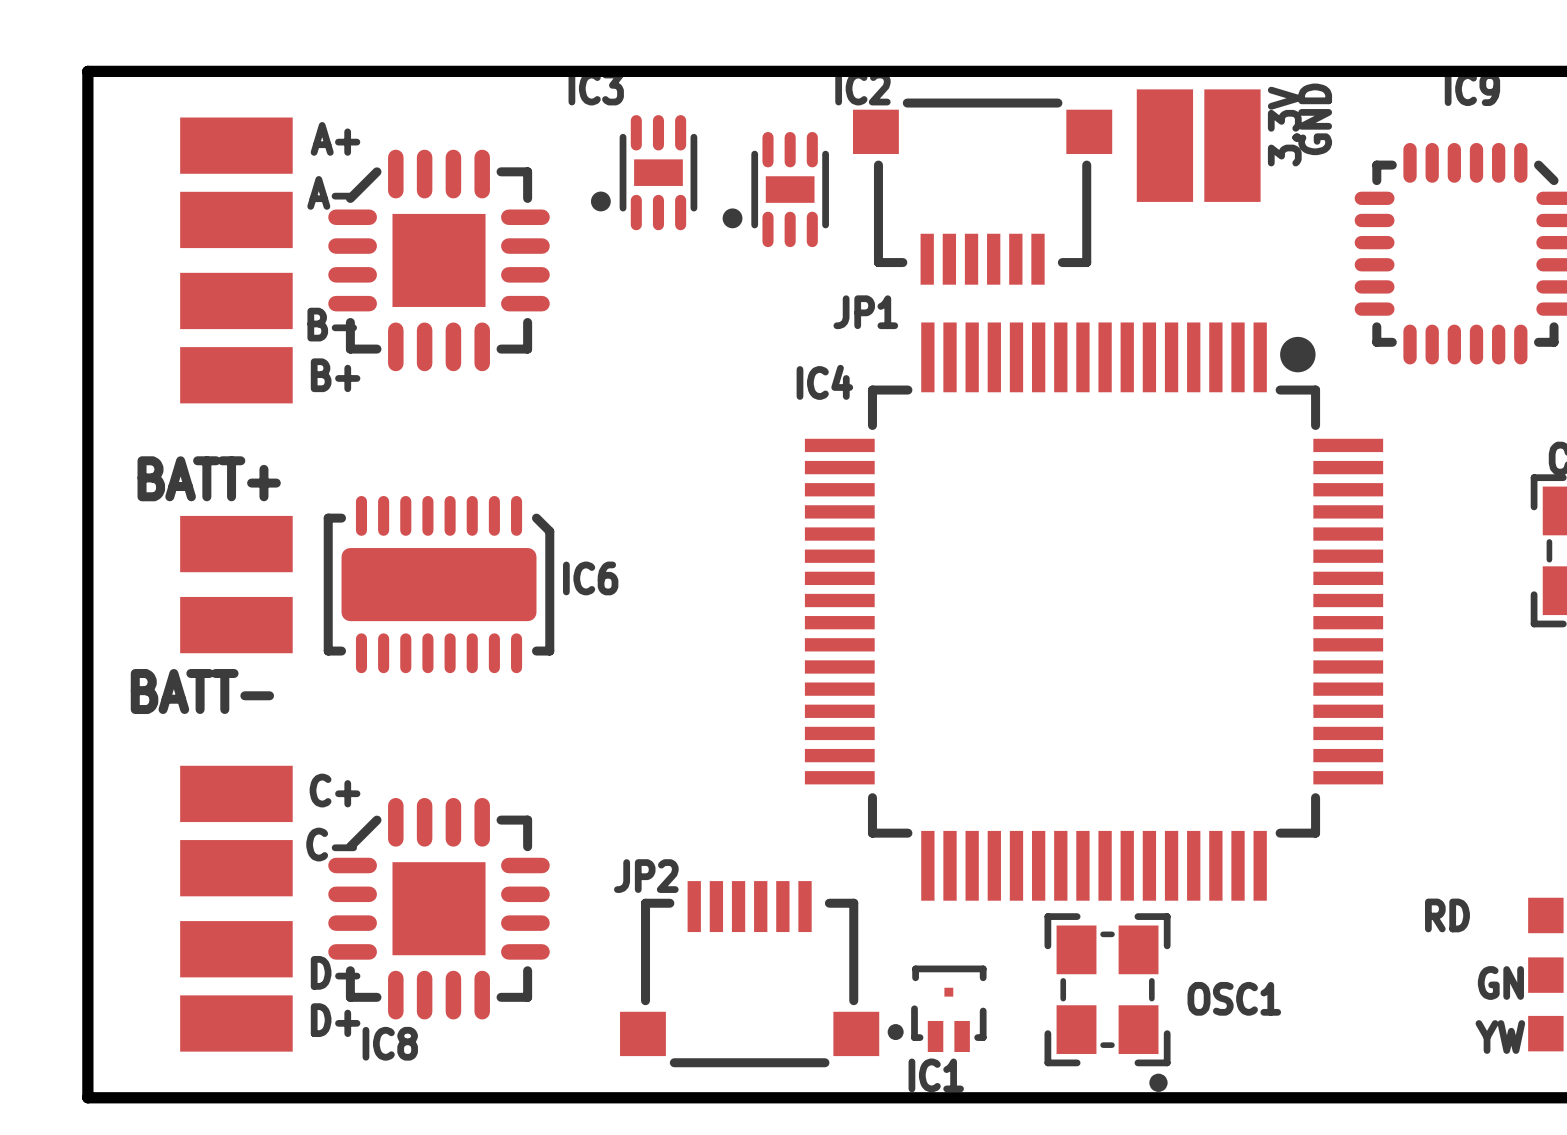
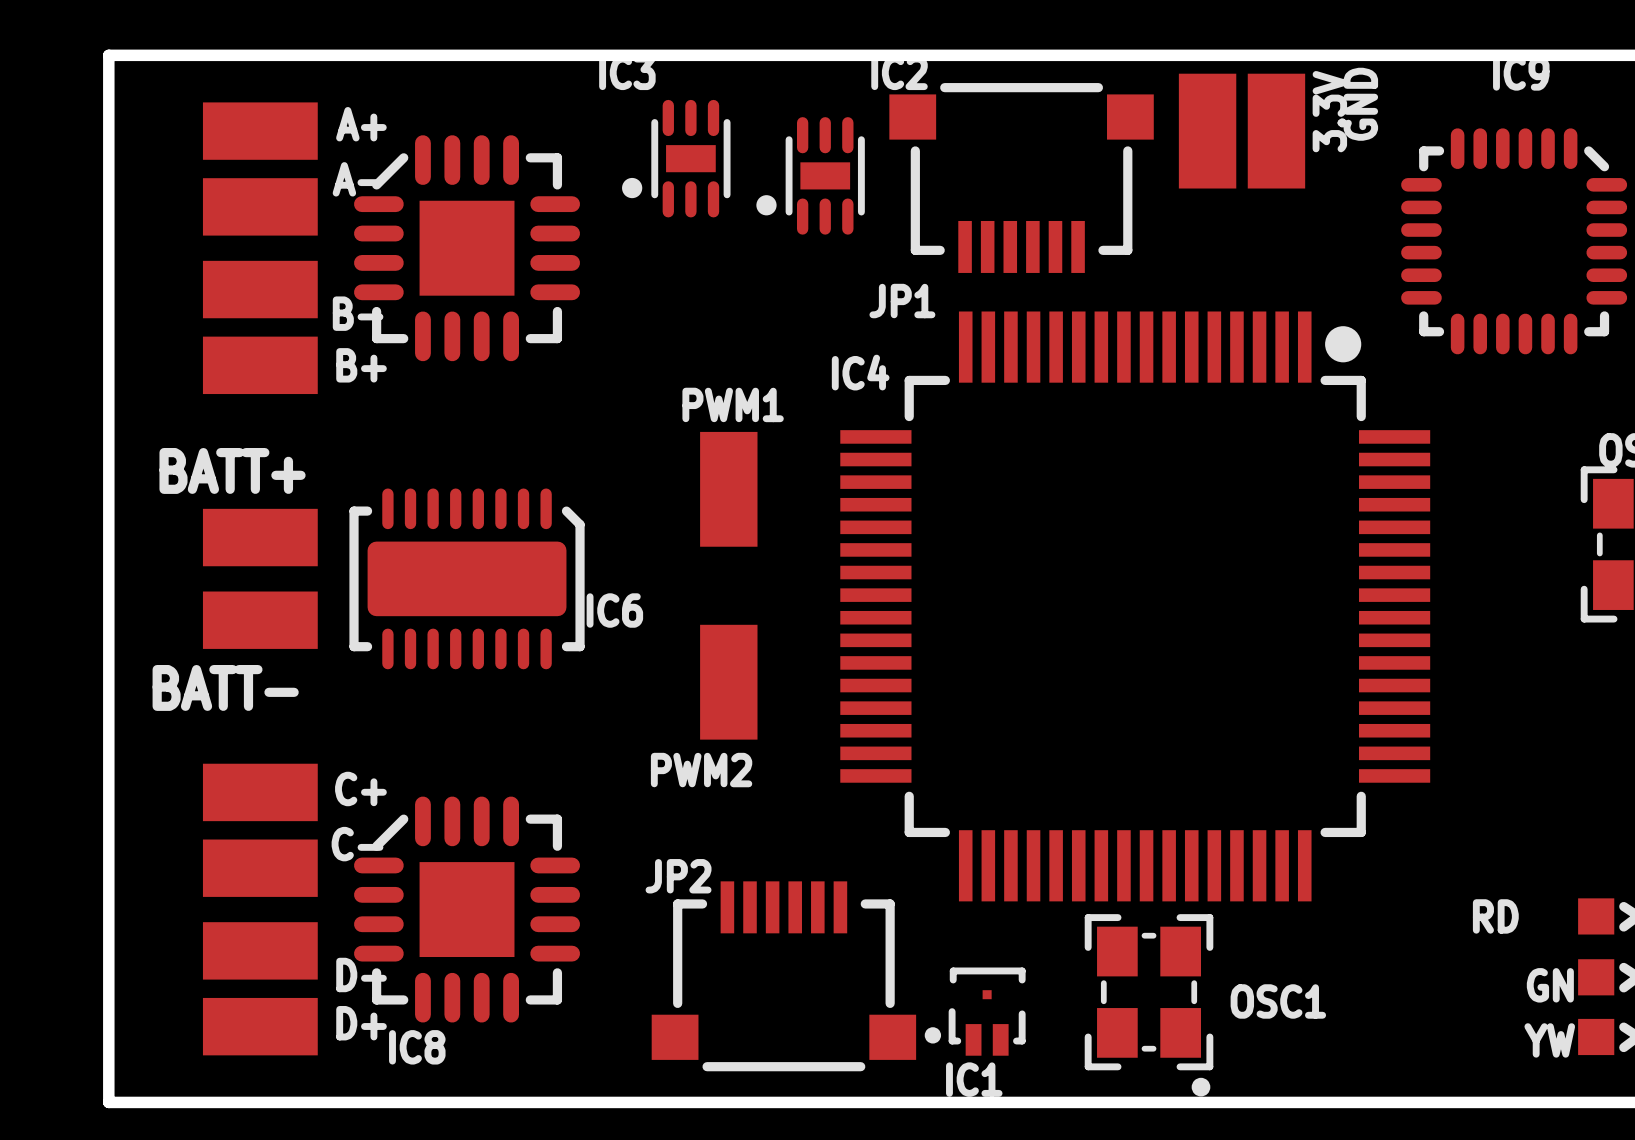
PWM1: none -> (728, 489)
IC6 name position: IC6 (590, 578) -> IC6 (614, 610)
PWM2: none -> (728, 682)

